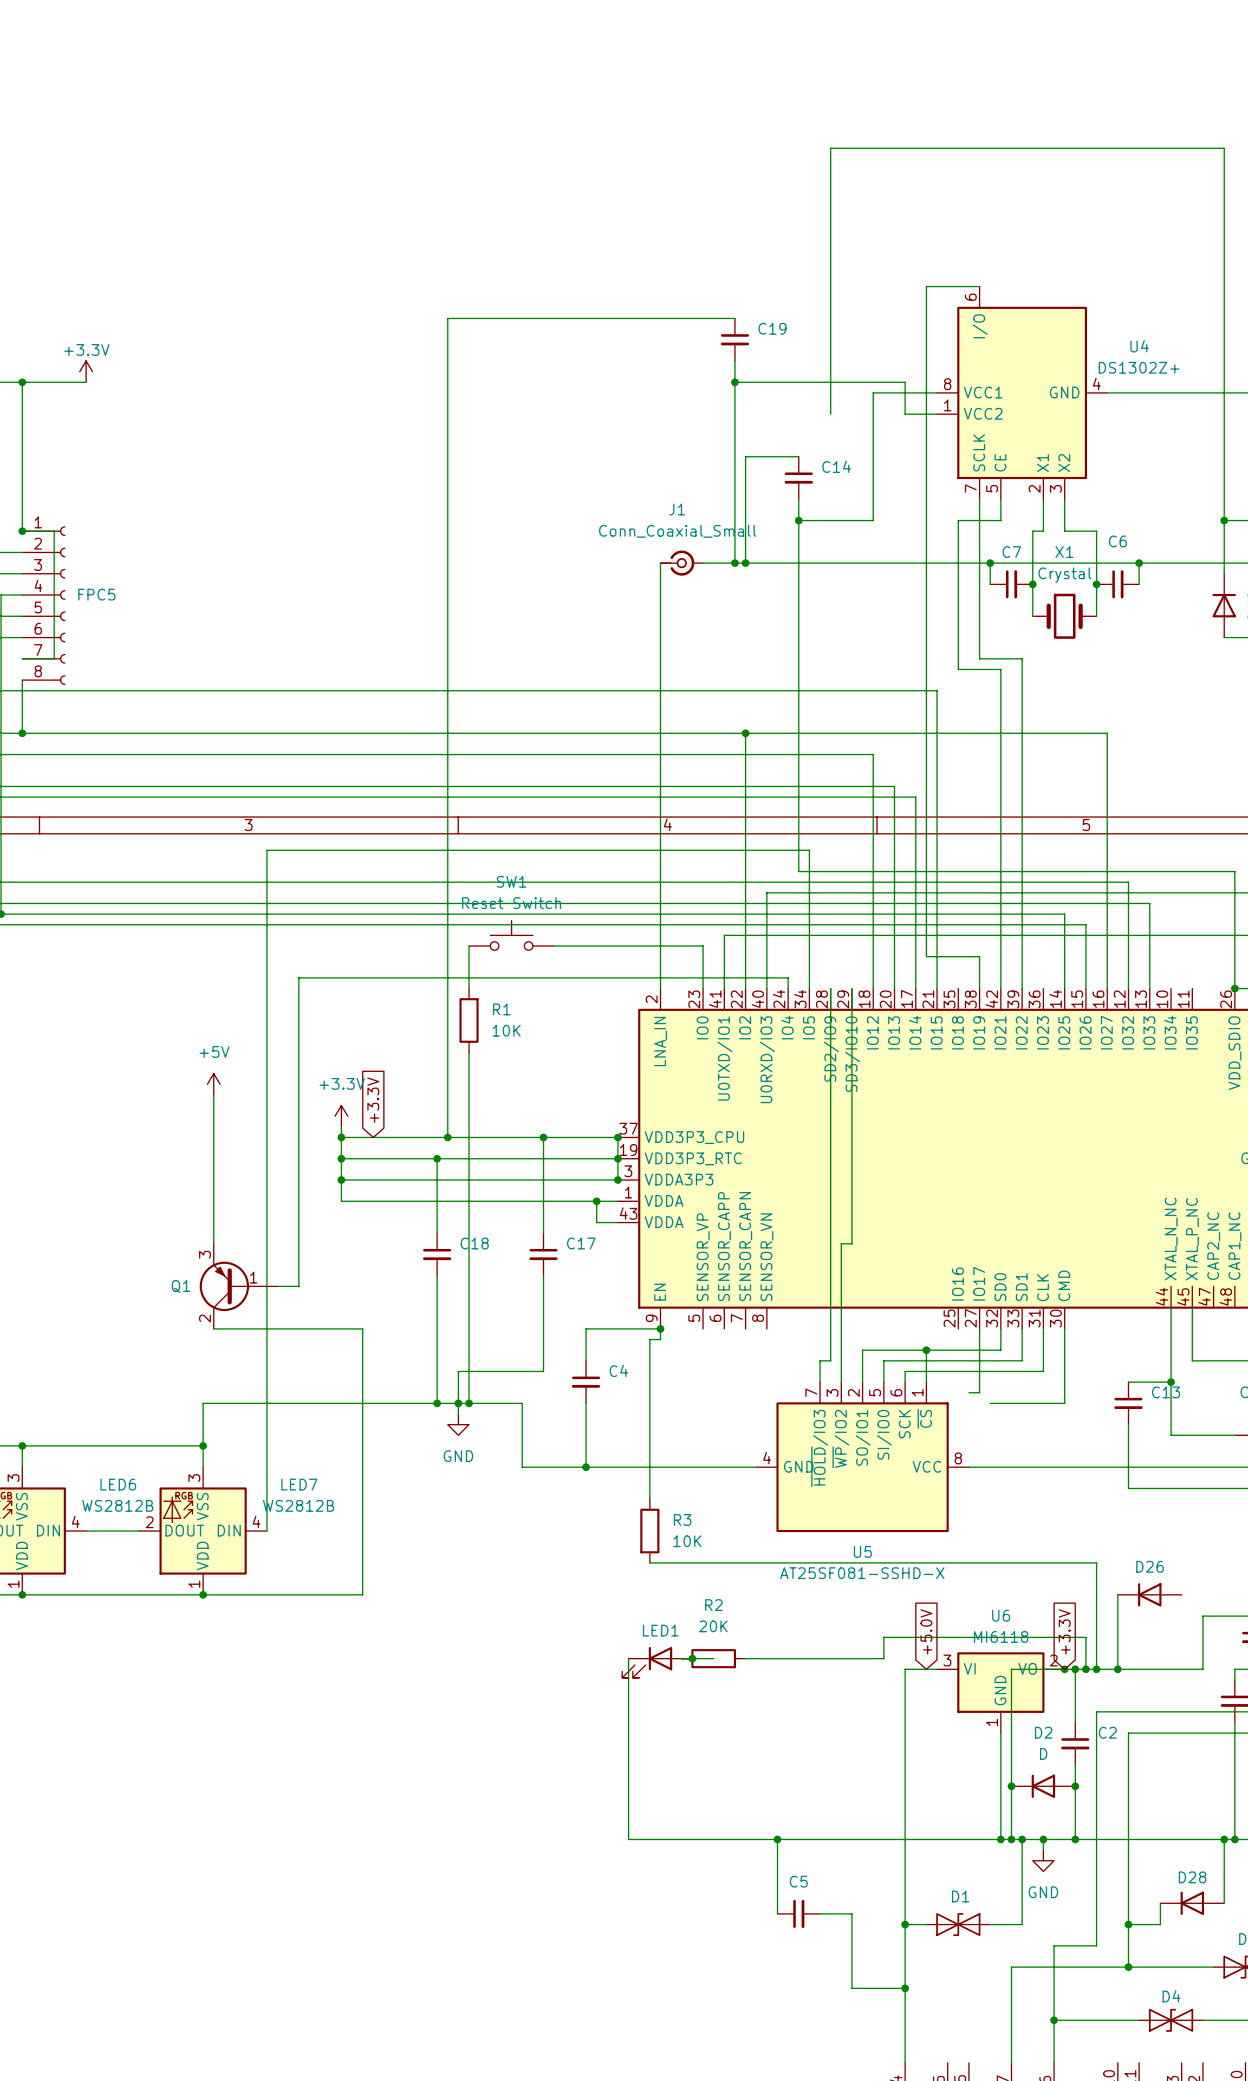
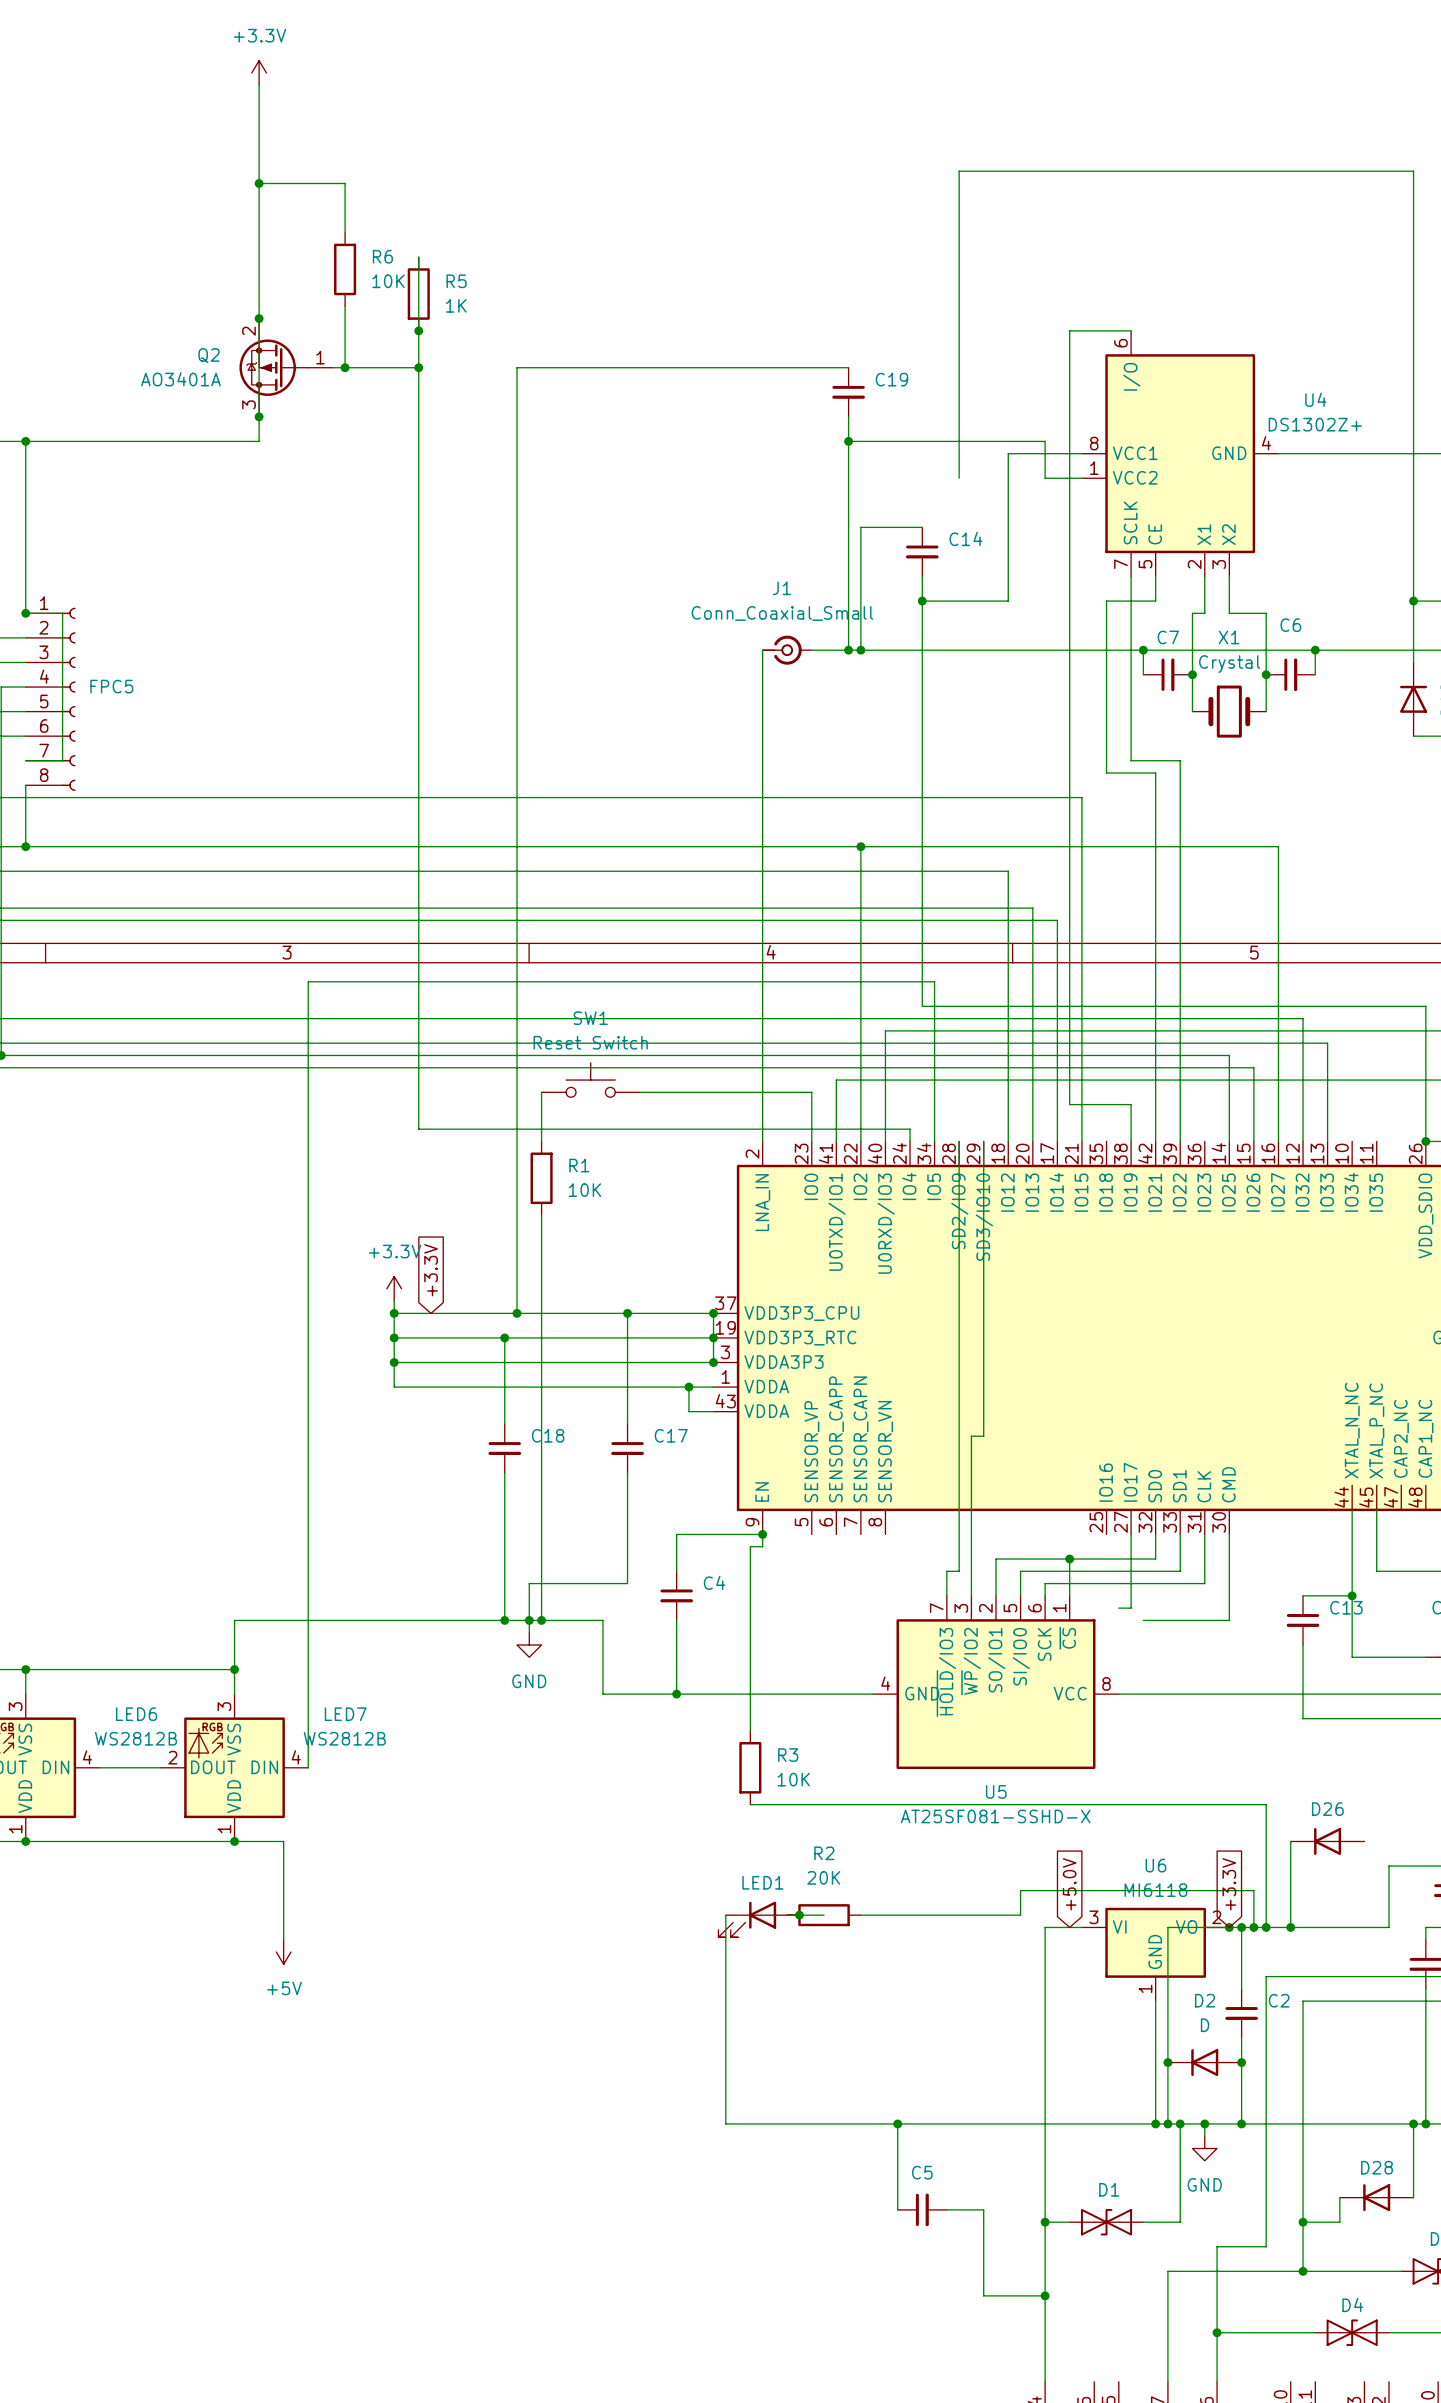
power symbol: none -> +3.3V (259, 72)
wire: none -> (259, 85) (259, 441) (99, 441)
wire: none -> (259, 183) (345, 183) (345, 232)
junction: none -> (259, 183)
R6: none -> 10K (345, 269)
R5: none -> 1K (418, 294)
wire: none -> (345, 306) (345, 367)
junction: none -> (259, 318)
junction: none -> (418, 330)
Q2: none -> AO3401A (286, 367)
wire: none -> (332, 367) (418, 367)
junction: none -> (345, 367)
junction: none -> (418, 367)
junction: none -> (259, 416)
power symbol: +3.3V (86, 371) -> none
wire: (362, 977) (298, 977) (298, 1286) (277, 1286) -> (418, 1129) (418, 257)
power symbol: +5V (213, 1084) -> none
wire: (213, 1094) (213, 1243) -> none
Q1: (238, 1286) -> none
wire: (213, 1328) (362, 1328) (362, 1594) (245, 1594) -> (283, 1939) (283, 1841)
power symbol: none -> +5V (283, 1952)

